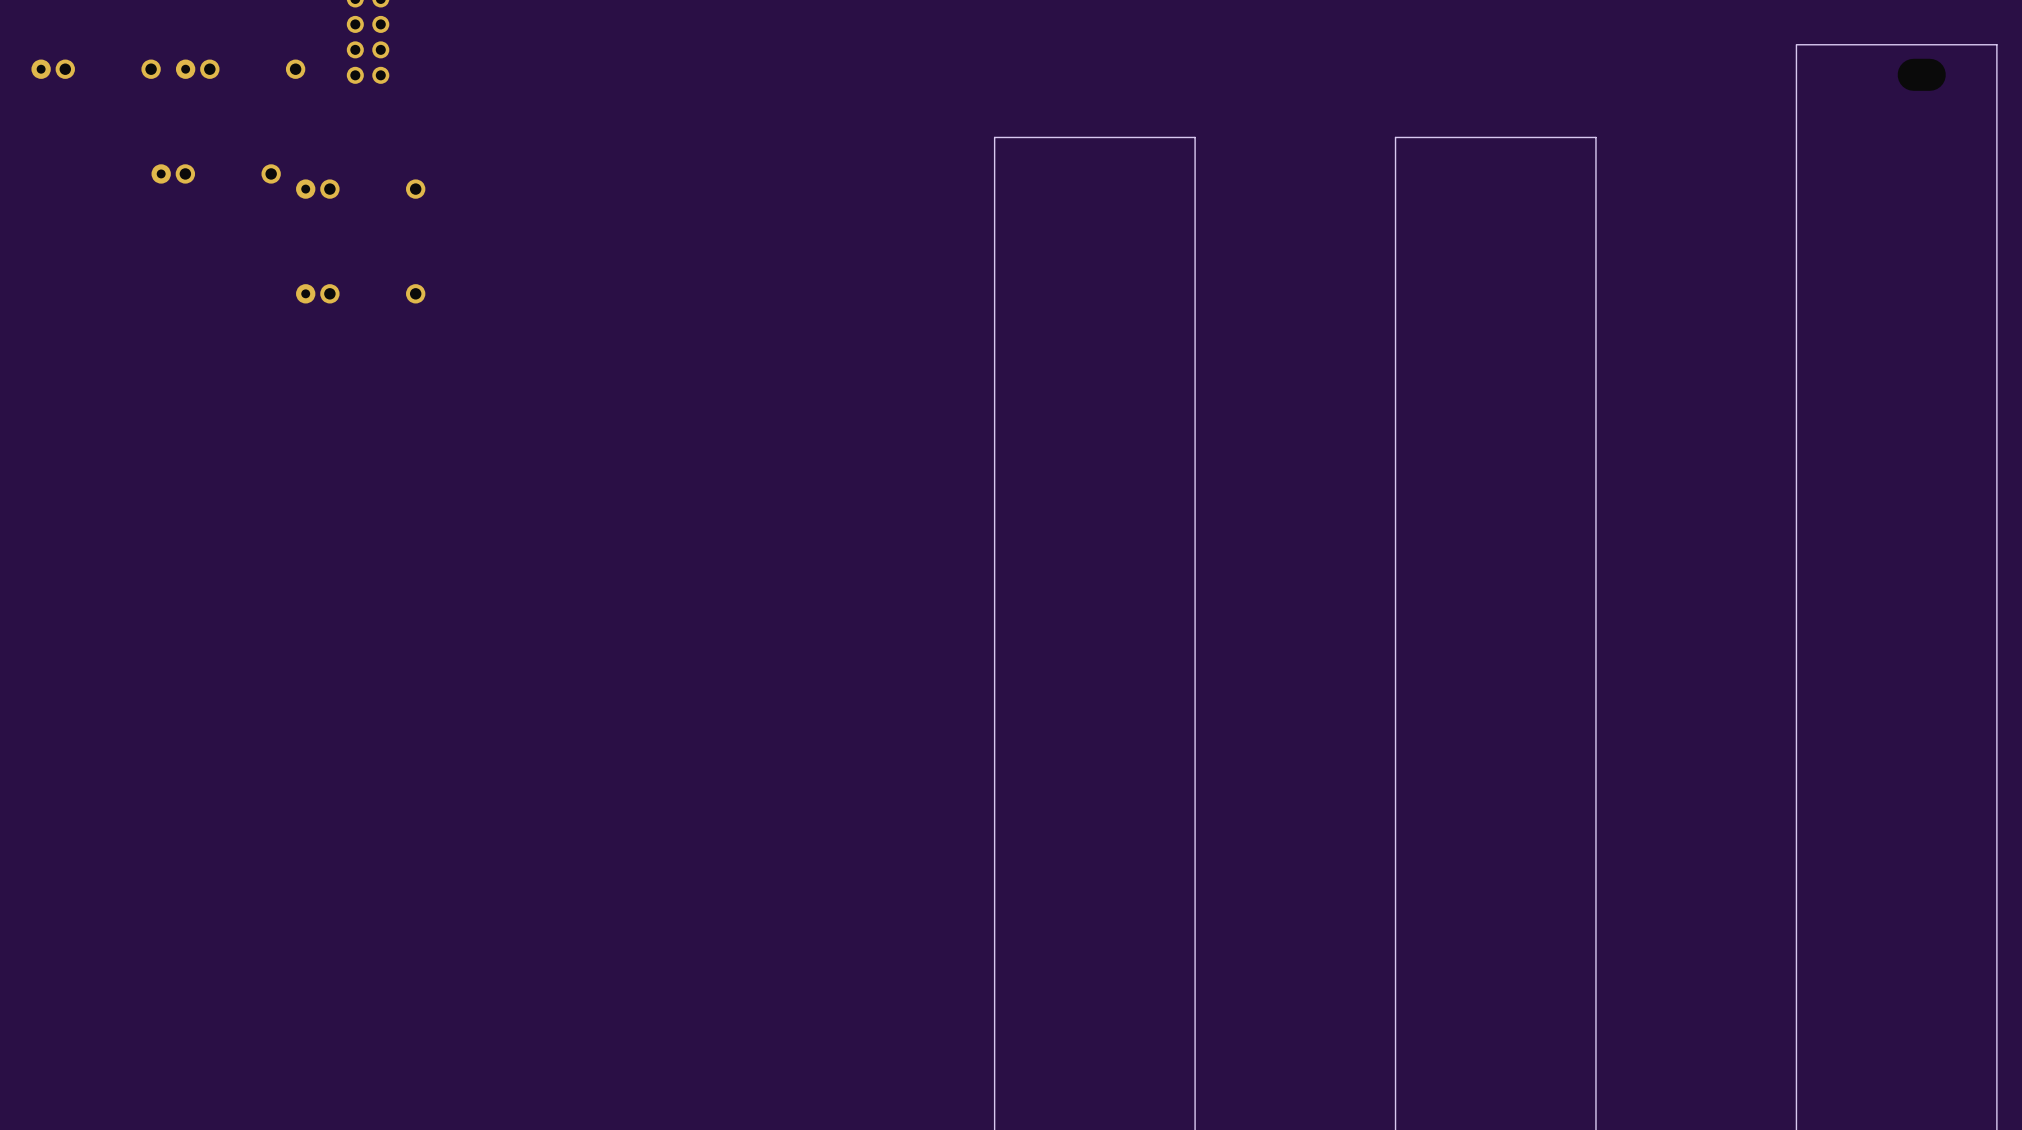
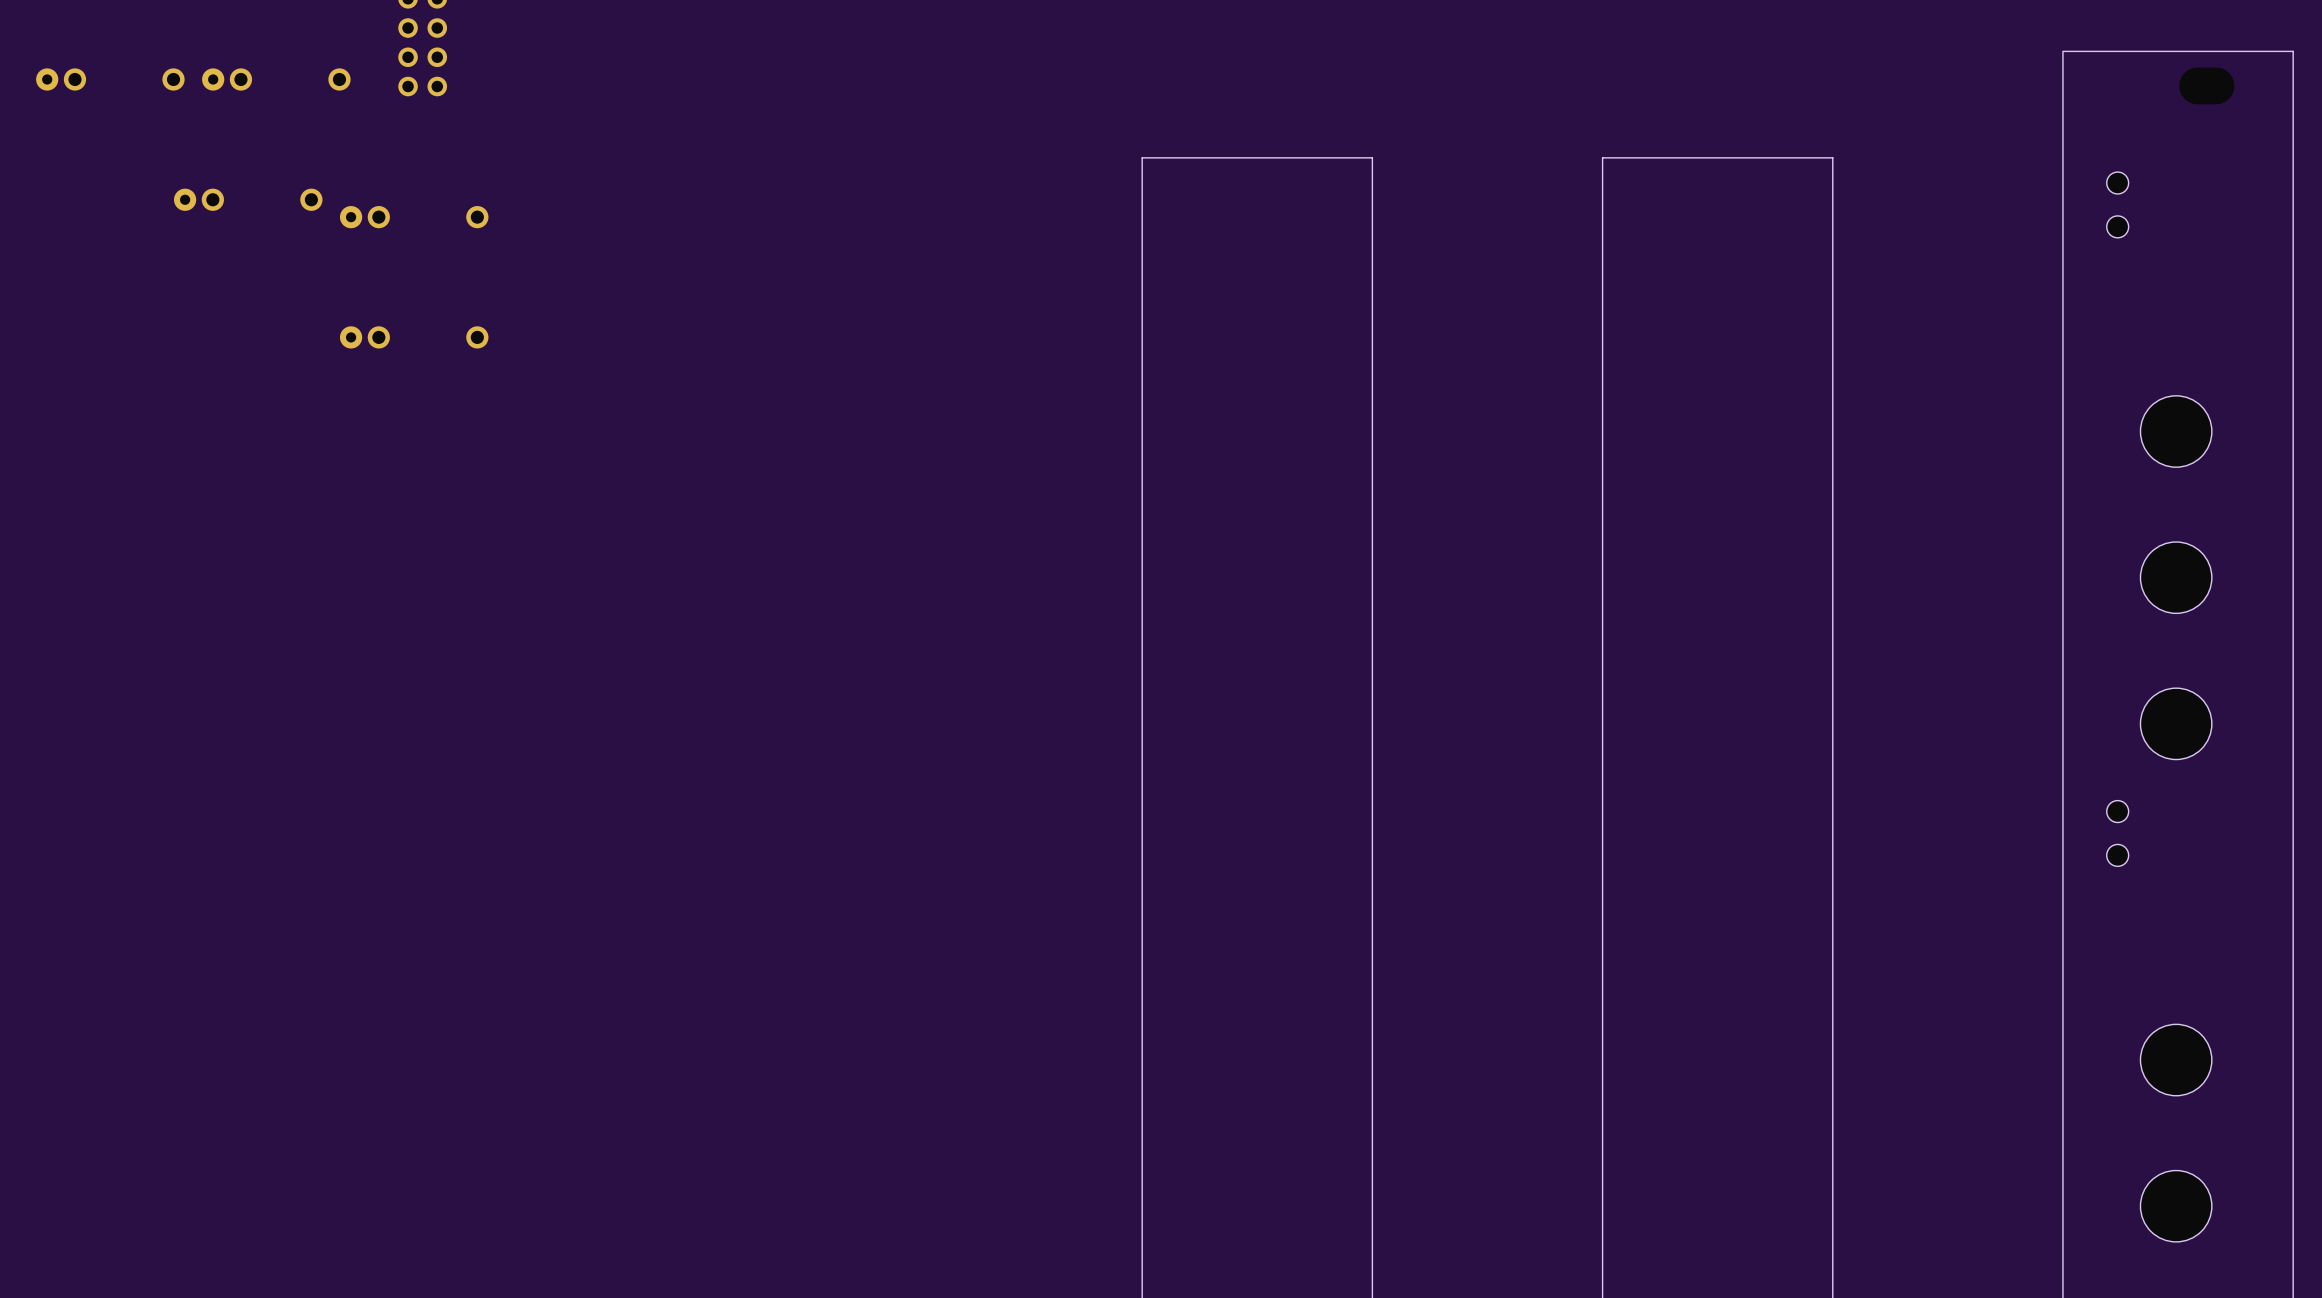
part: none -> (2117, 183)
part: none -> (2117, 226)
part: none -> (2176, 431)
part: none -> (2176, 577)
part: none -> (2176, 723)
part: none -> (2117, 811)
part: none -> (2117, 855)
part: none -> (2176, 1060)
part: none -> (2176, 1206)

